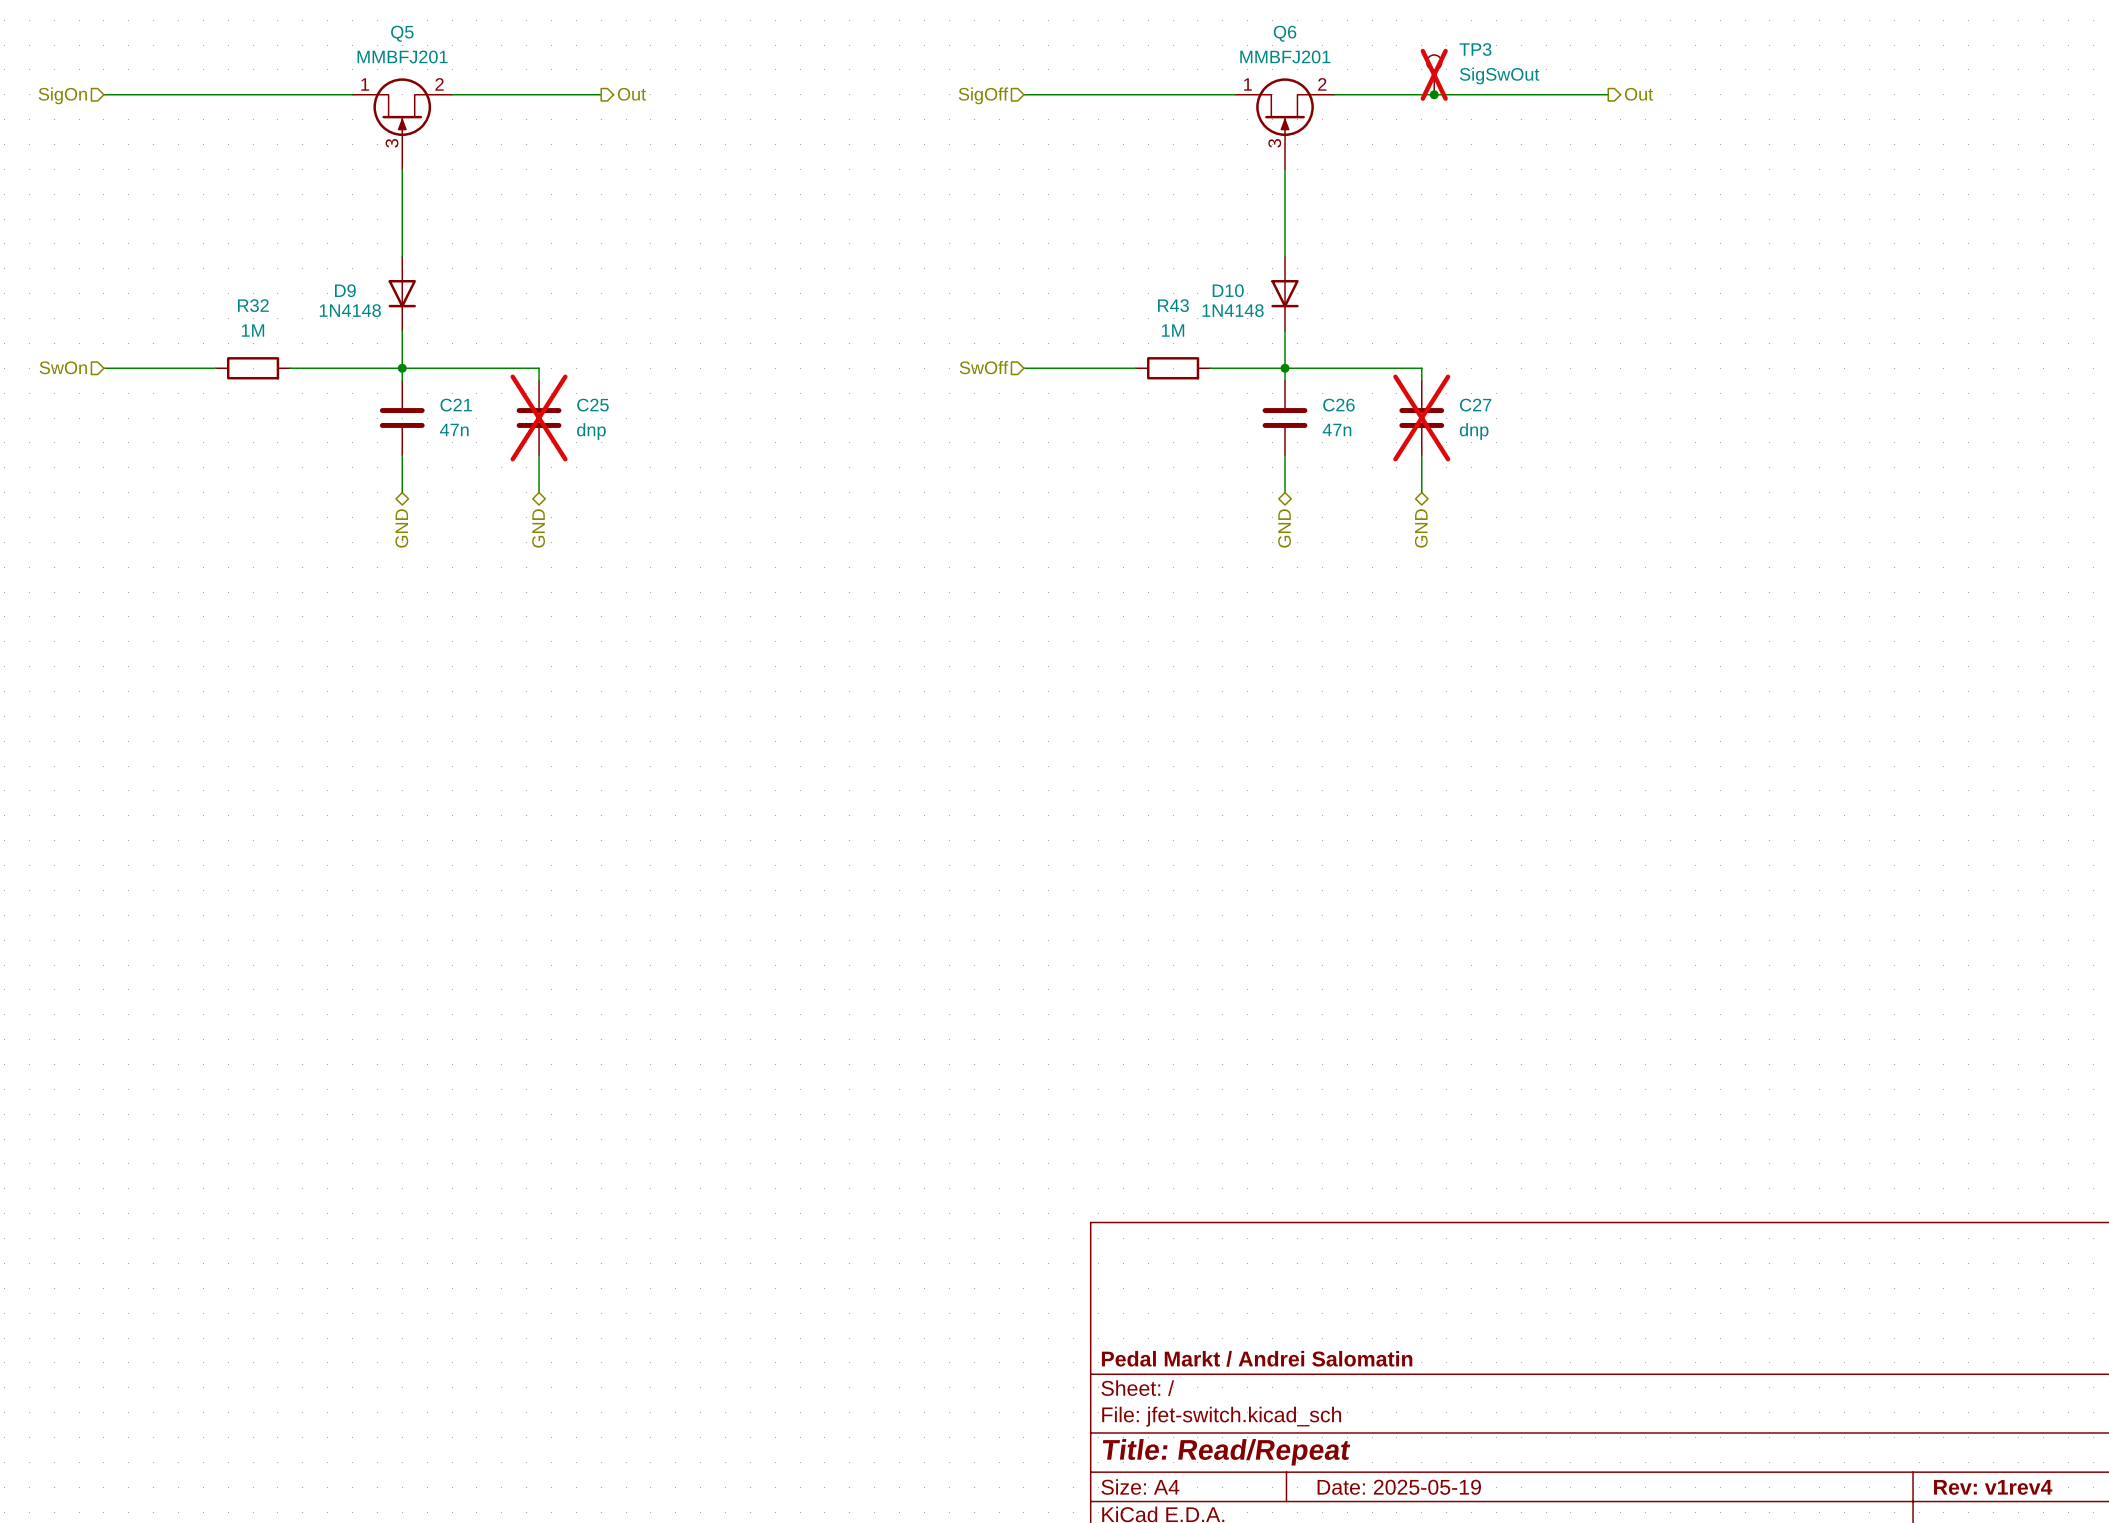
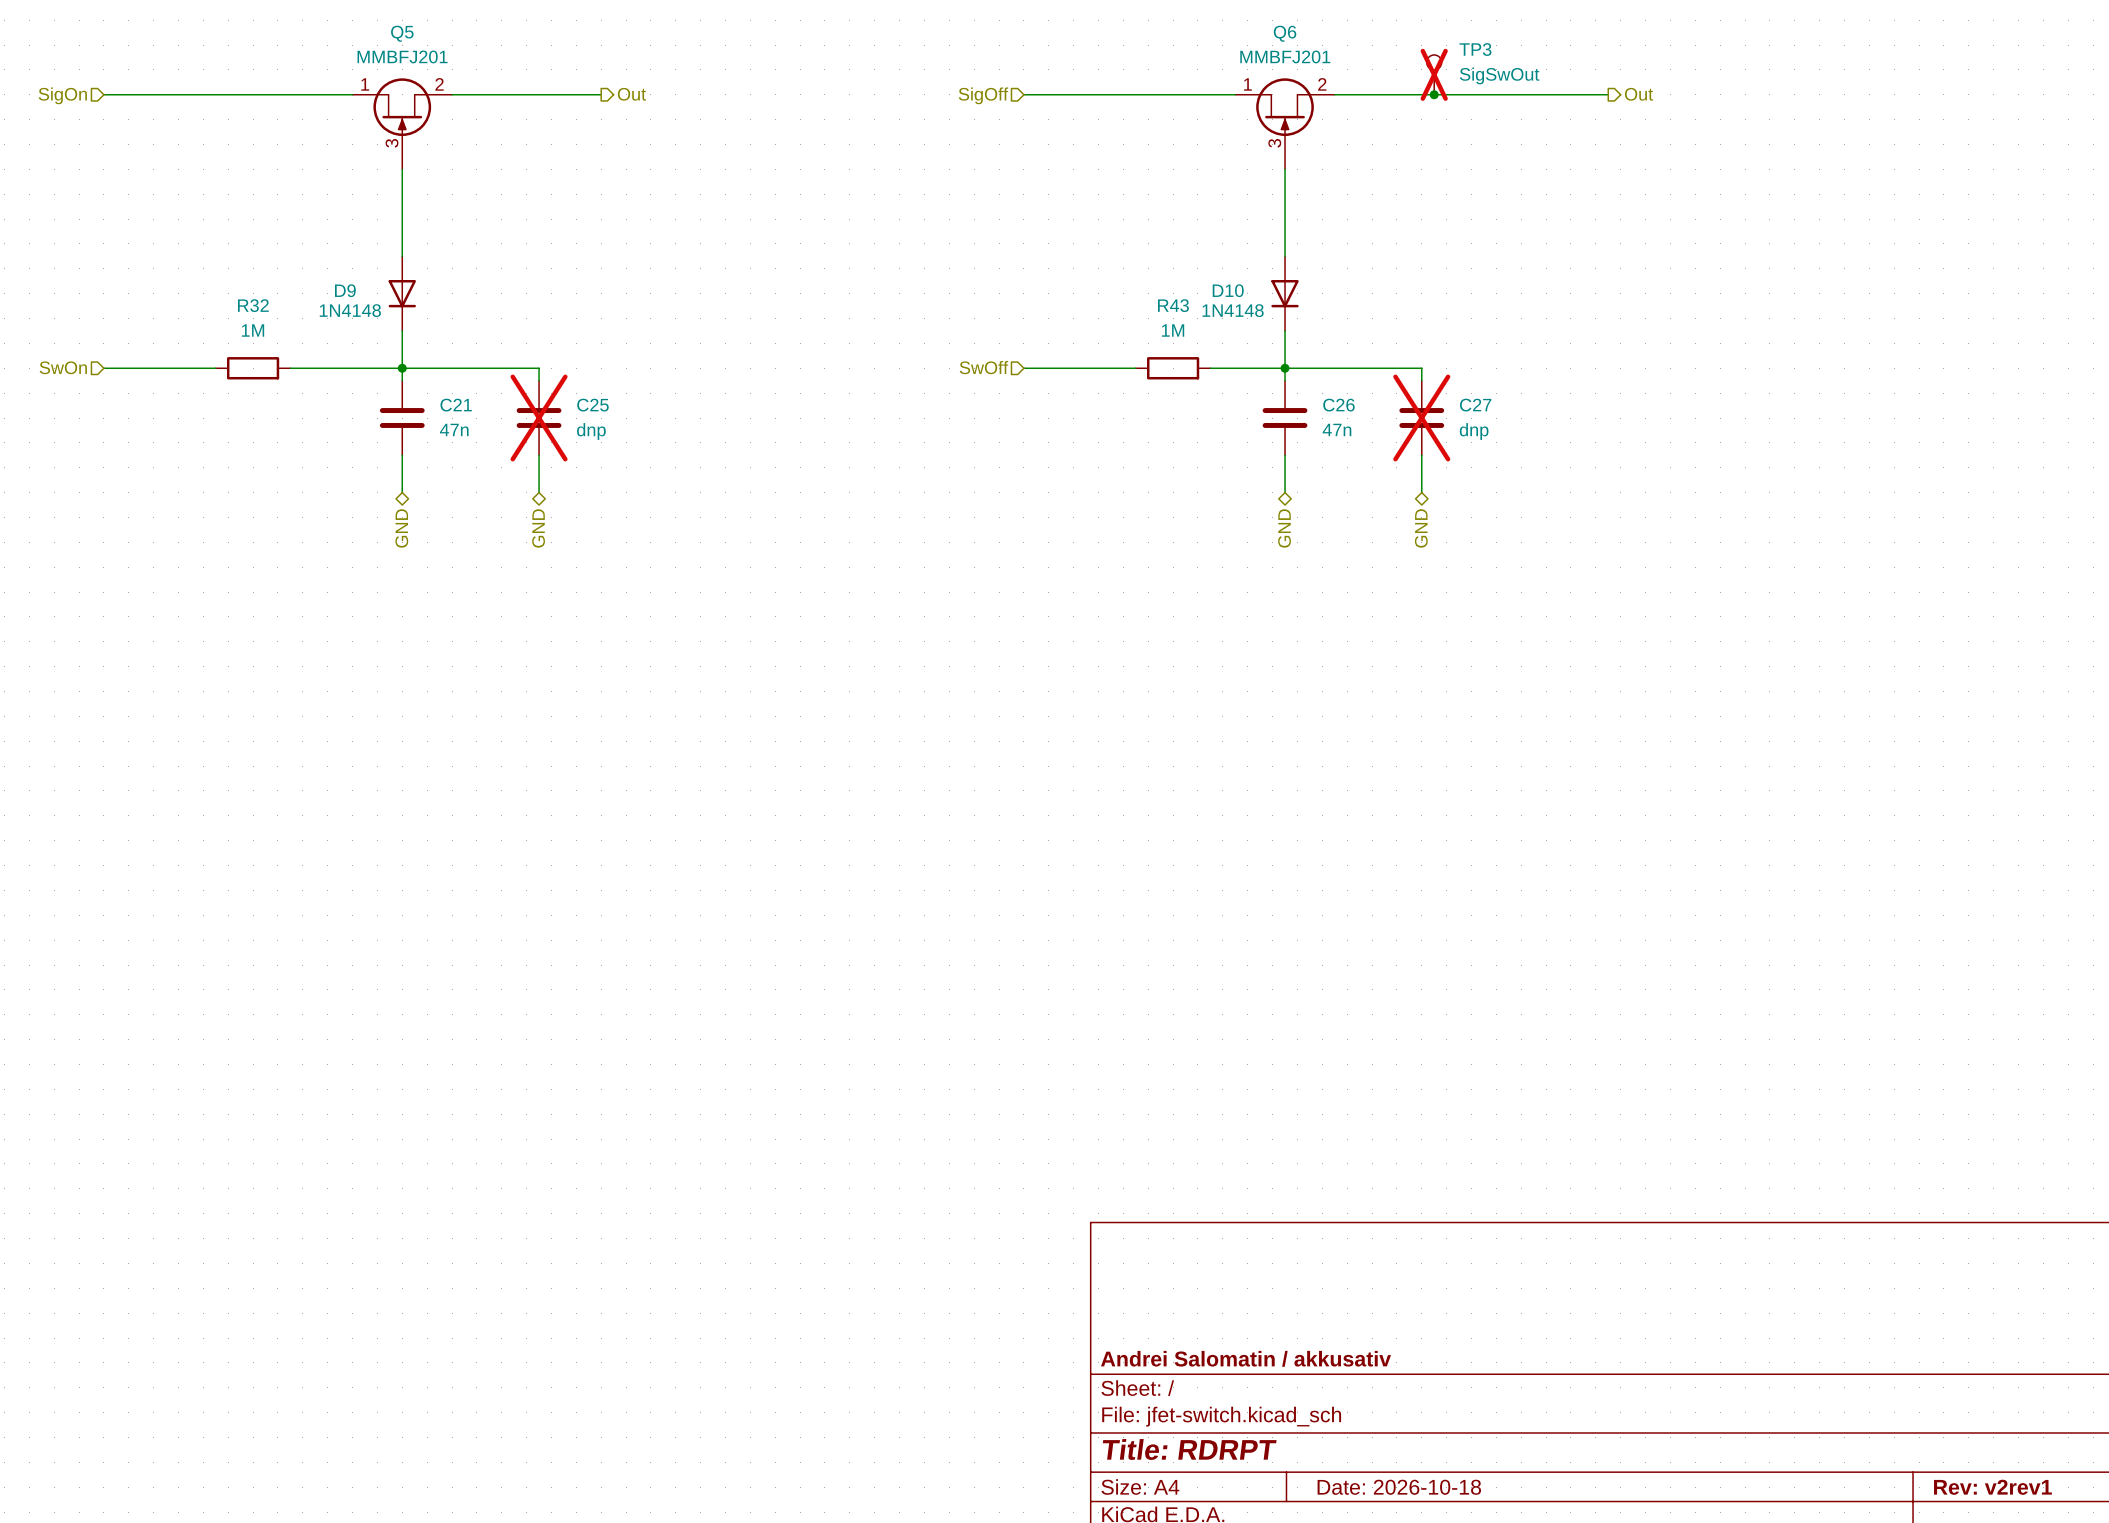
title block: Pedal Markt / Andrei Salomatin (1257, 1358) -> Andrei Salomatin / akkusativ (1246, 1358)
title block: Title: Read/Repeat (1226, 1452) -> Title: RDRPT (1189, 1449)
title block: Date: 2025-05-19 (1399, 1487) -> Date: 2026-10-18 (1399, 1487)
title block: Rev: v1rev4 (1993, 1487) -> Rev: v2rev1 (1992, 1487)

